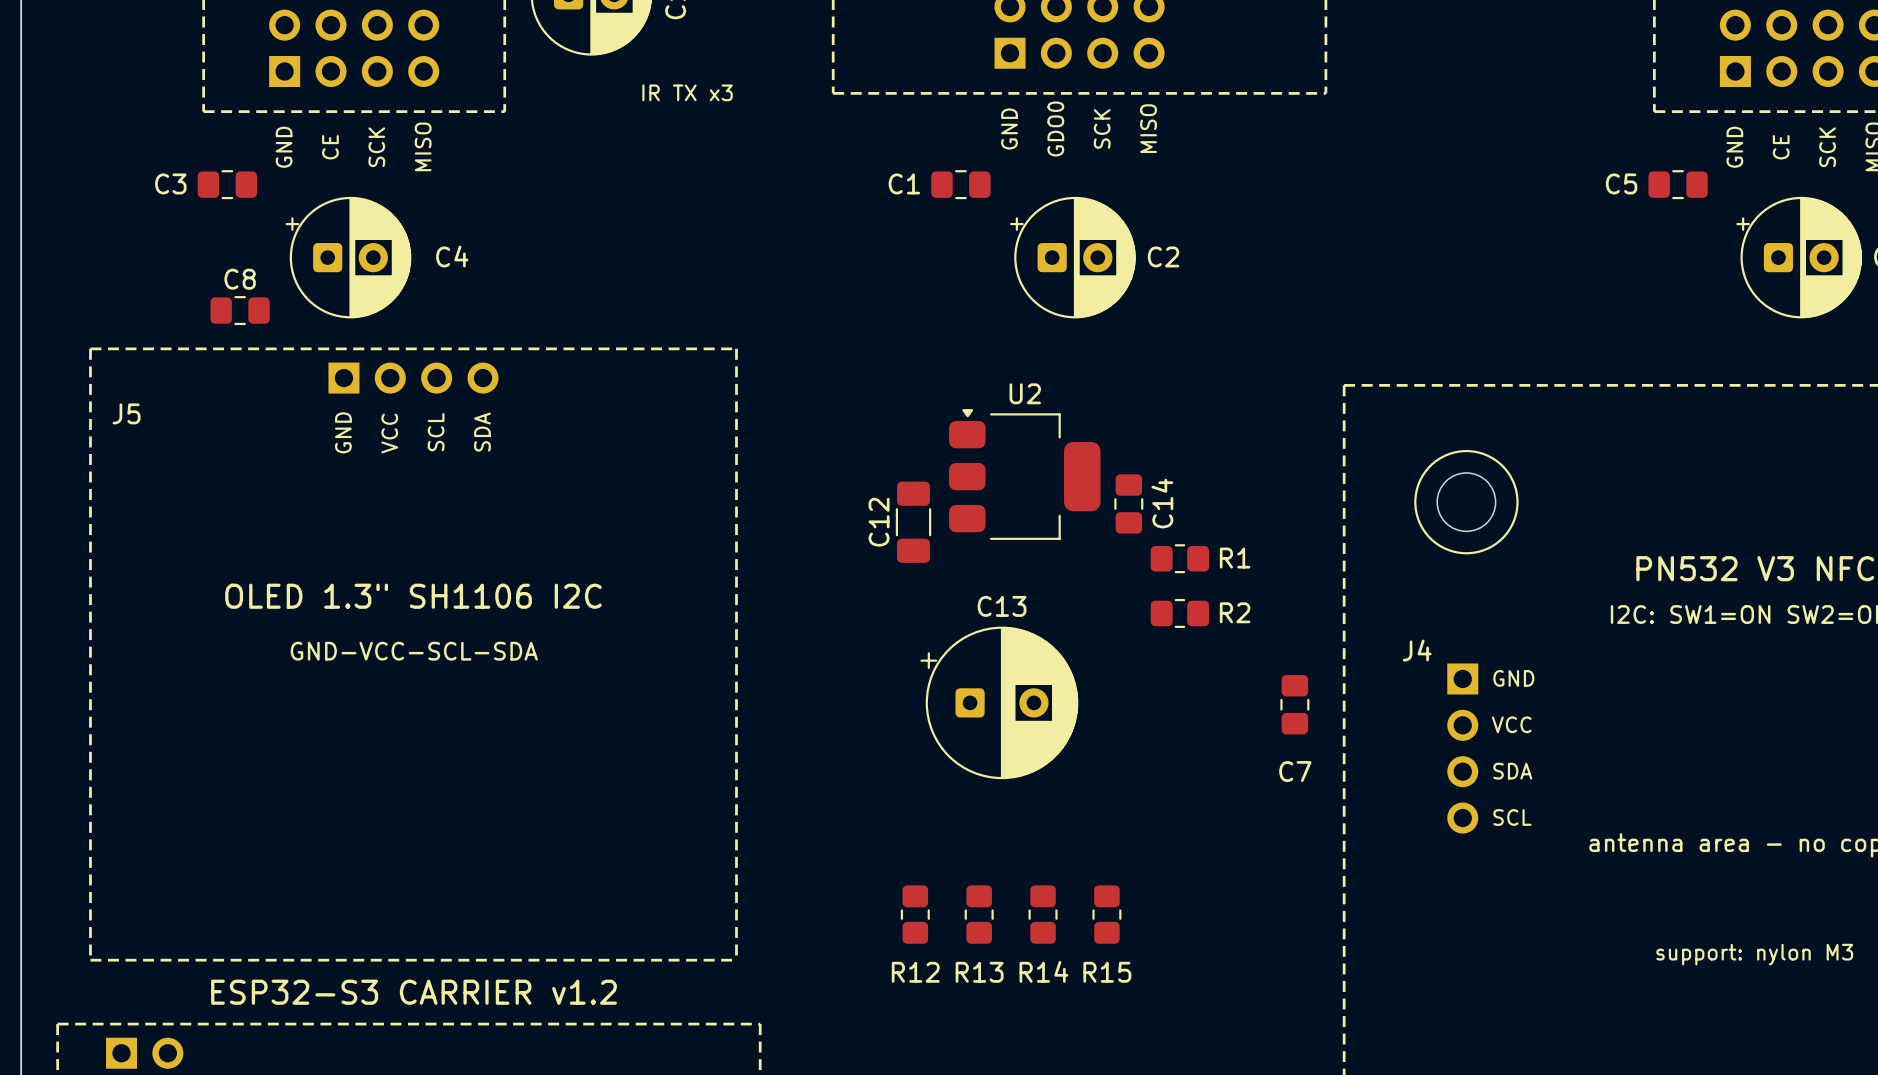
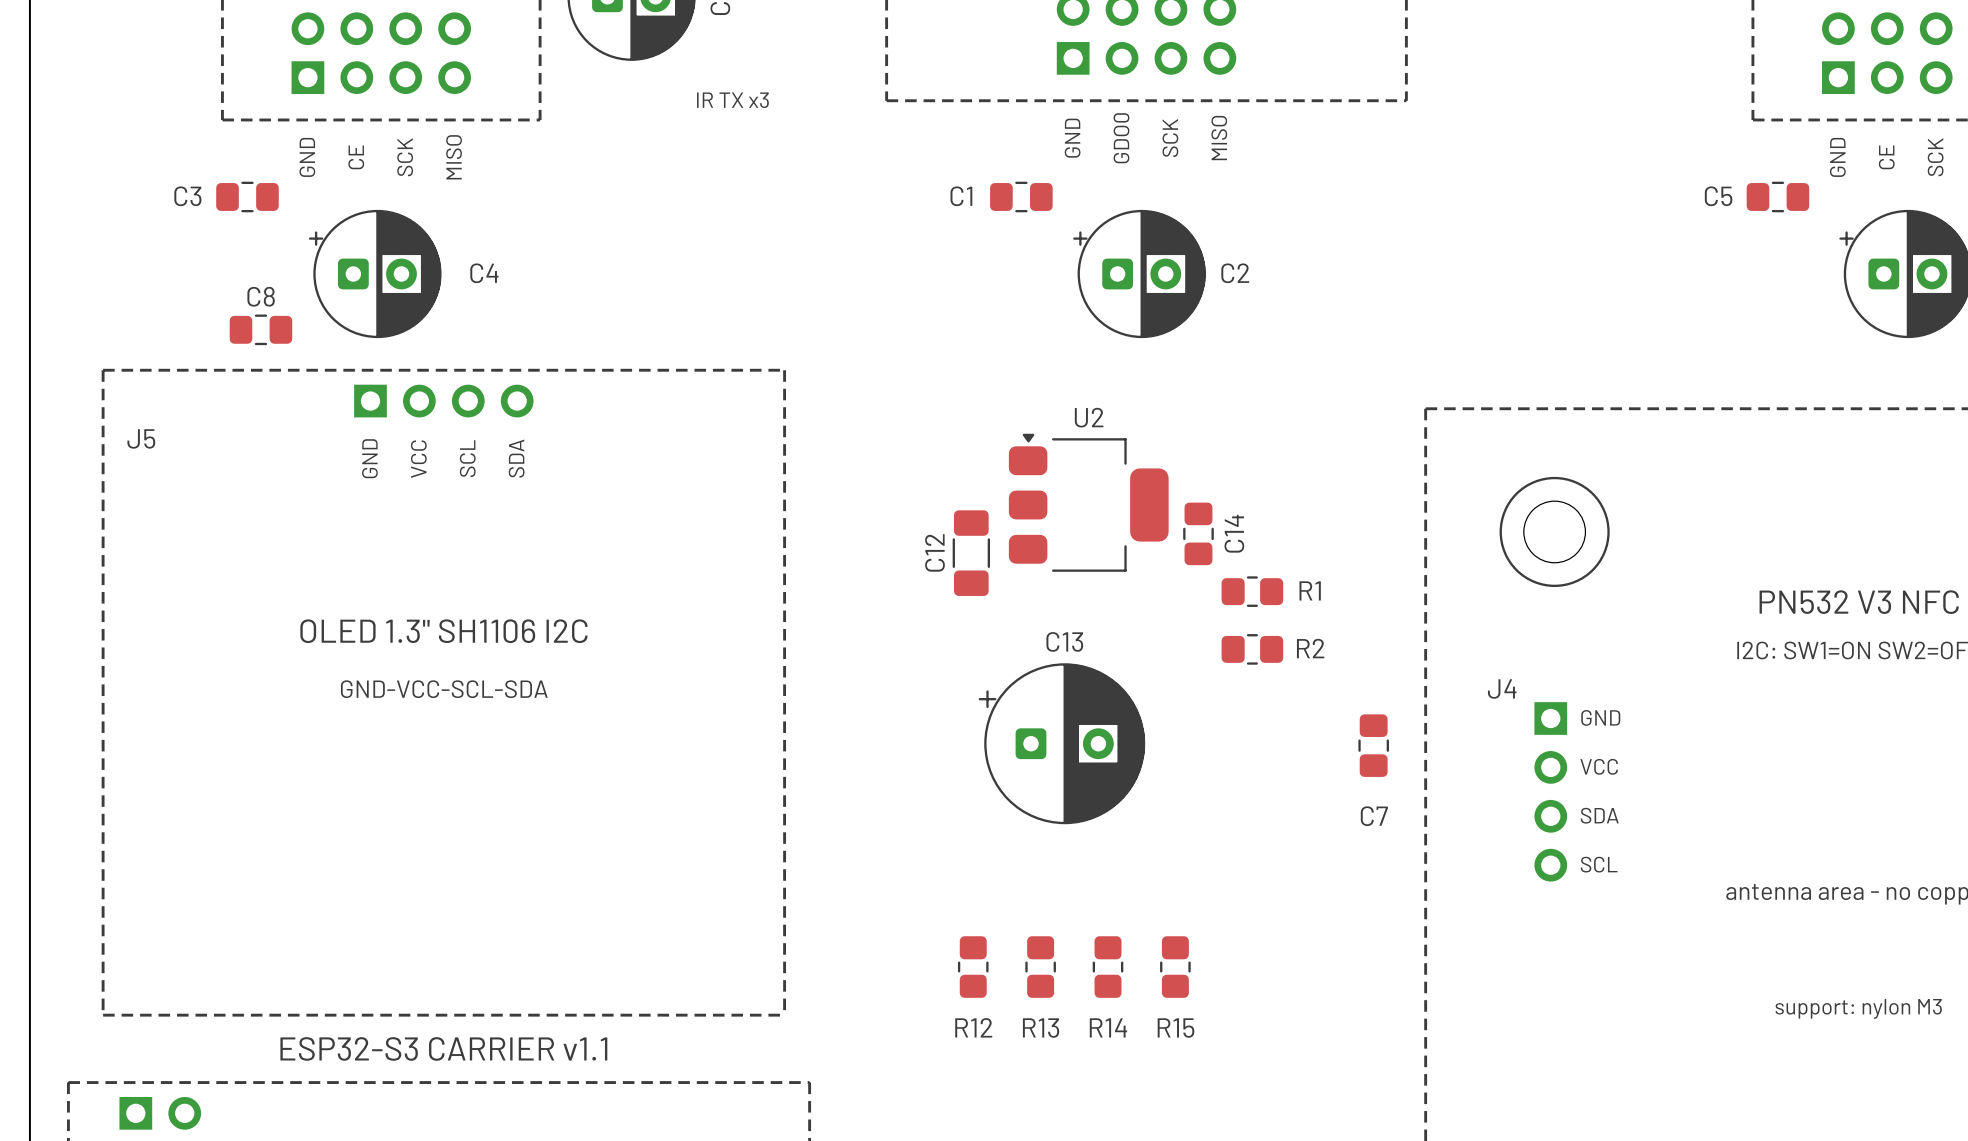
text: ESP32-S3 CARRIER v1.2 (414, 992) -> ESP32-S3 CARRIER v1.1 (443, 1048)

